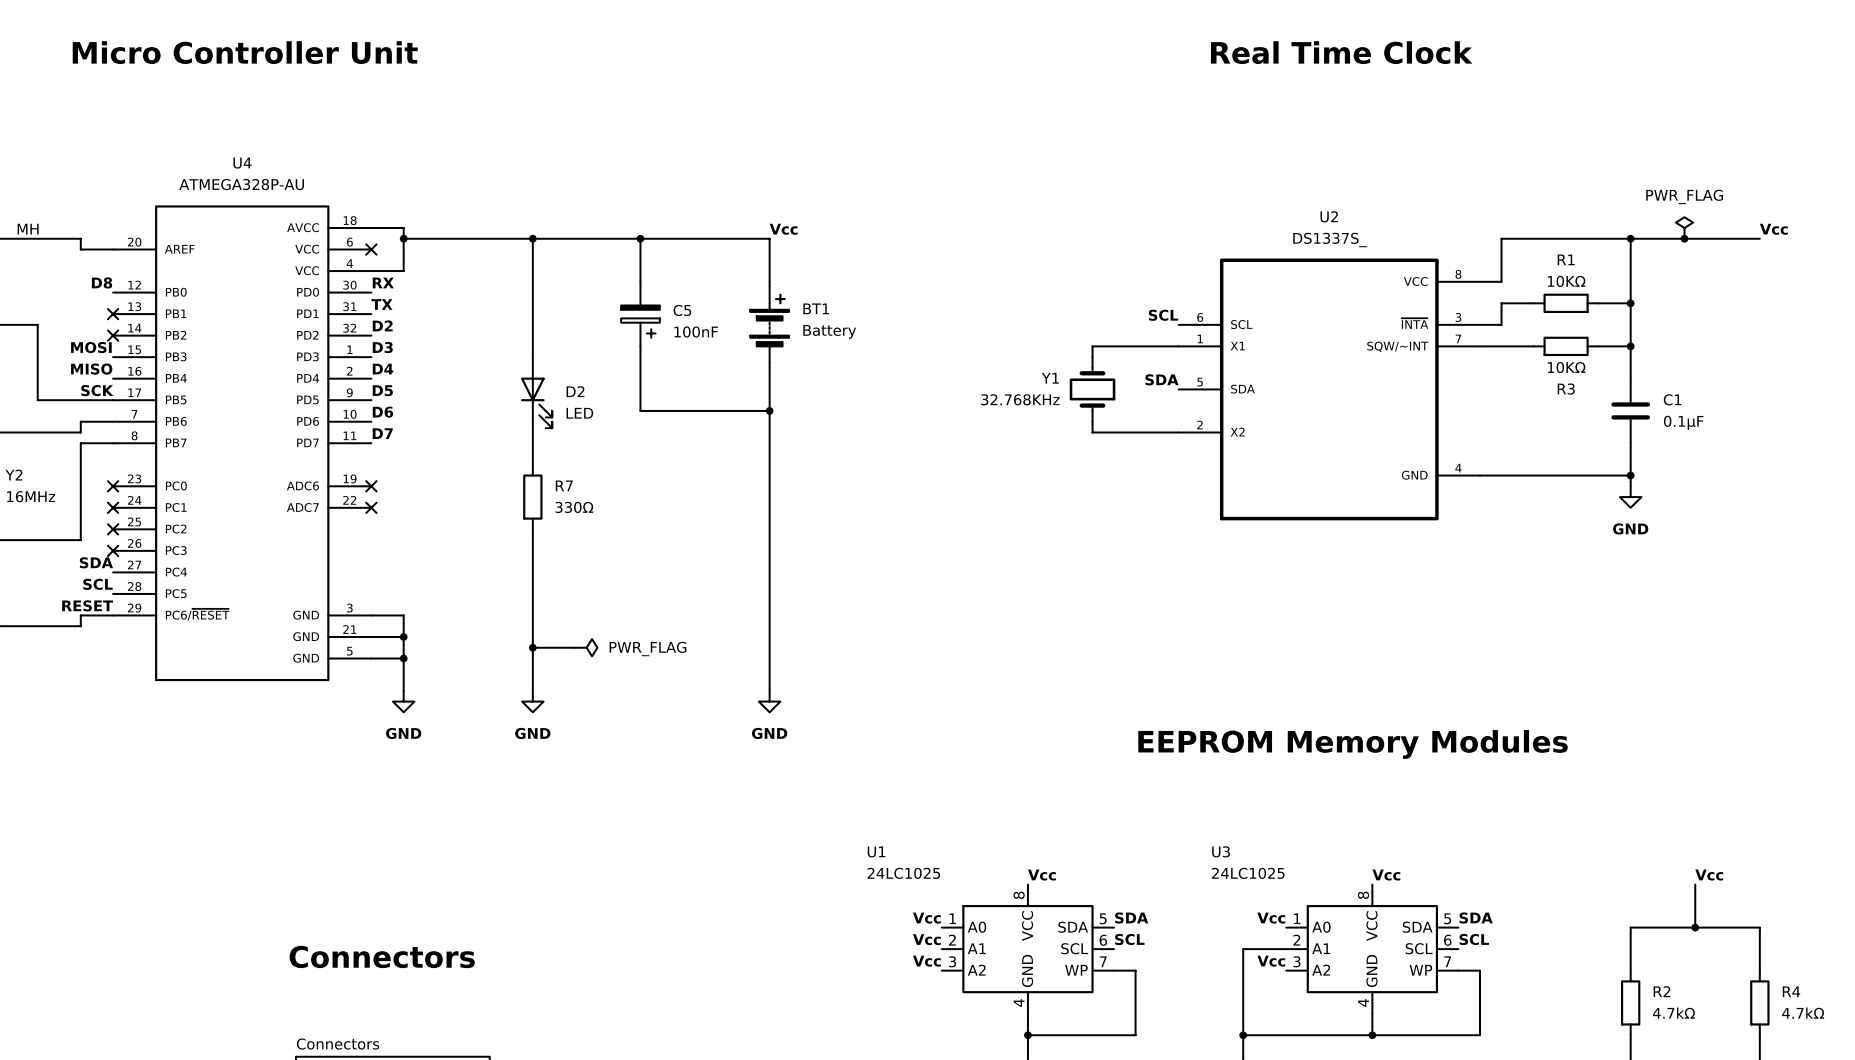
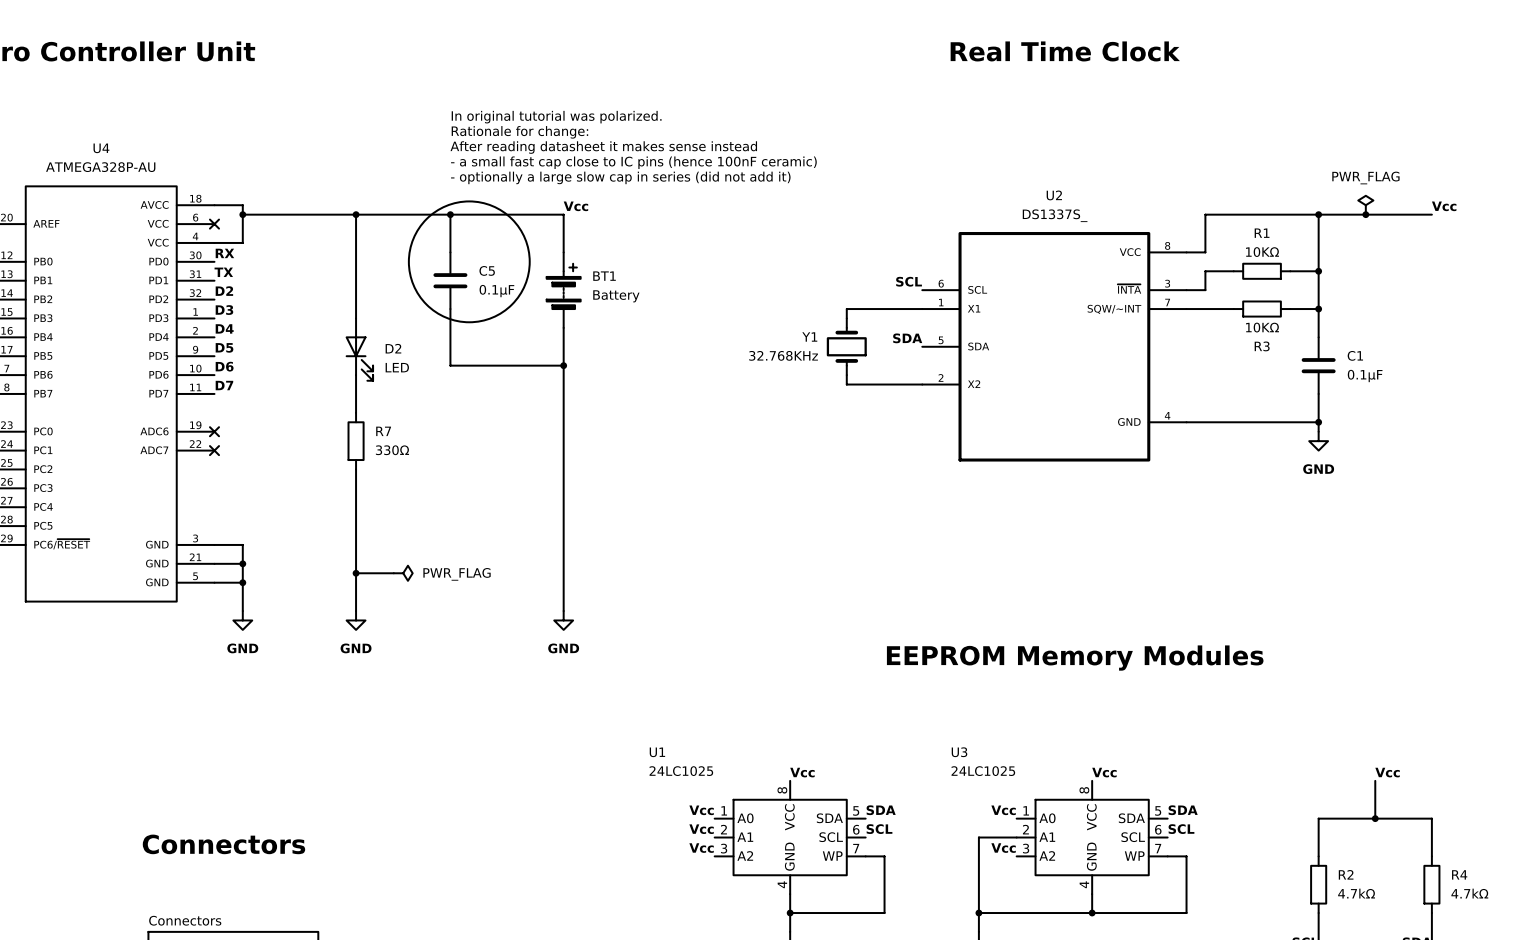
text: none -> In original tutorial was polarized. (556, 117)
text: none -> Rationale for change: (519, 132)
text: none -> After reading datasheet it makes sense instead (603, 147)
text: none -> - a small fast cap close to IC pins (hence 100nF ceramic) (633, 162)
text: none -> - optionally a large slow cap in series (did not add it) (620, 177)
drawing: none -> [408, 201, 530, 323]
C5 symbol: [621, 281, 660, 347] -> [433, 252, 468, 310]
C5 value: 100nF (696, 331) -> 0.1μF (496, 291)

